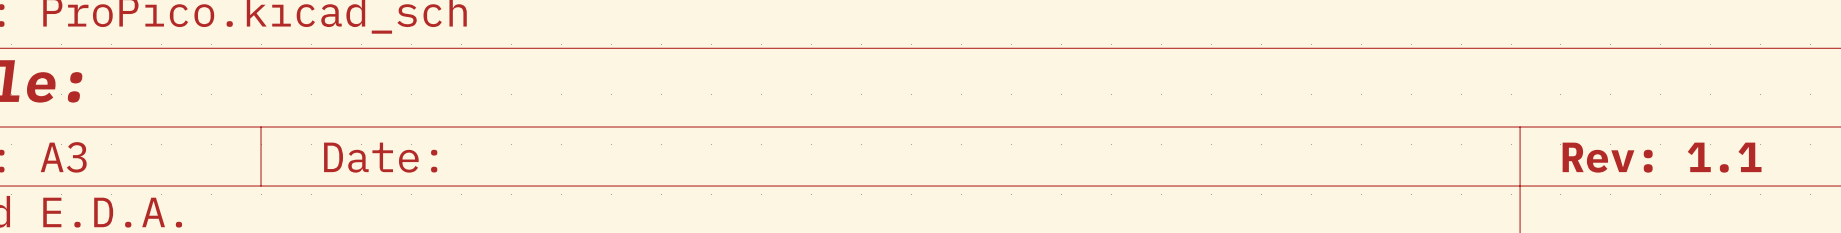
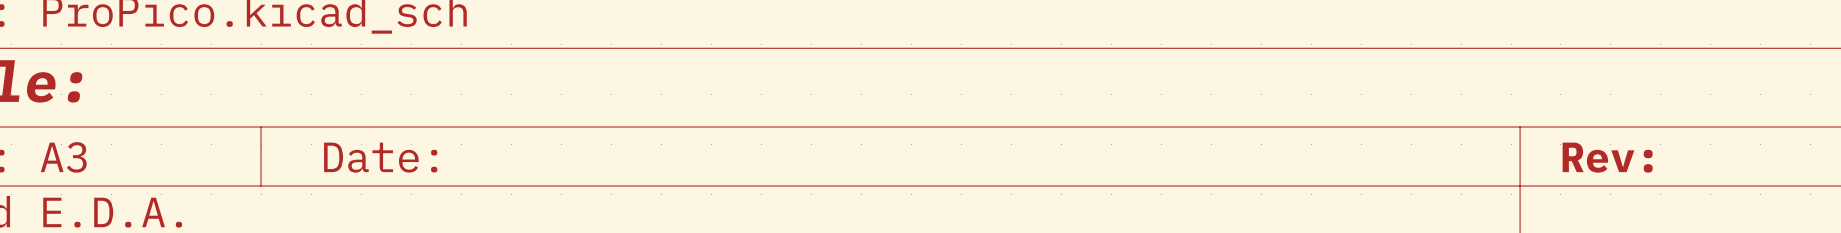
title block: Rev: 1.1 (1662, 157) -> Rev: (1607, 157)

